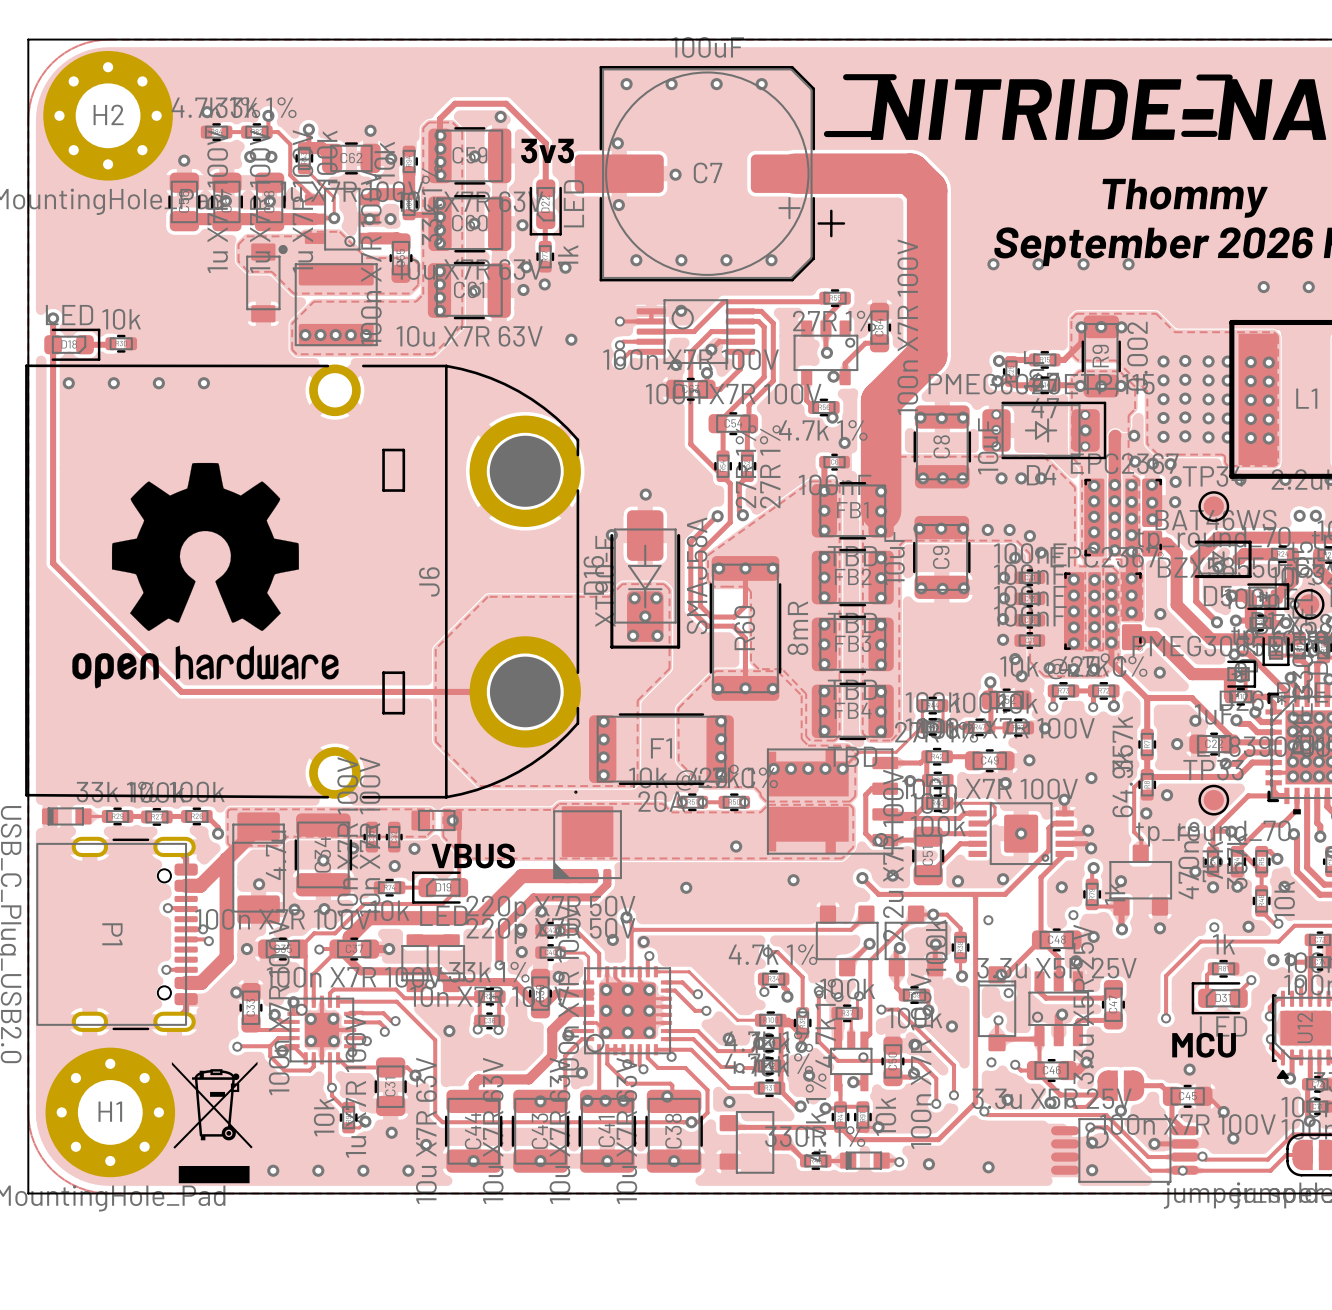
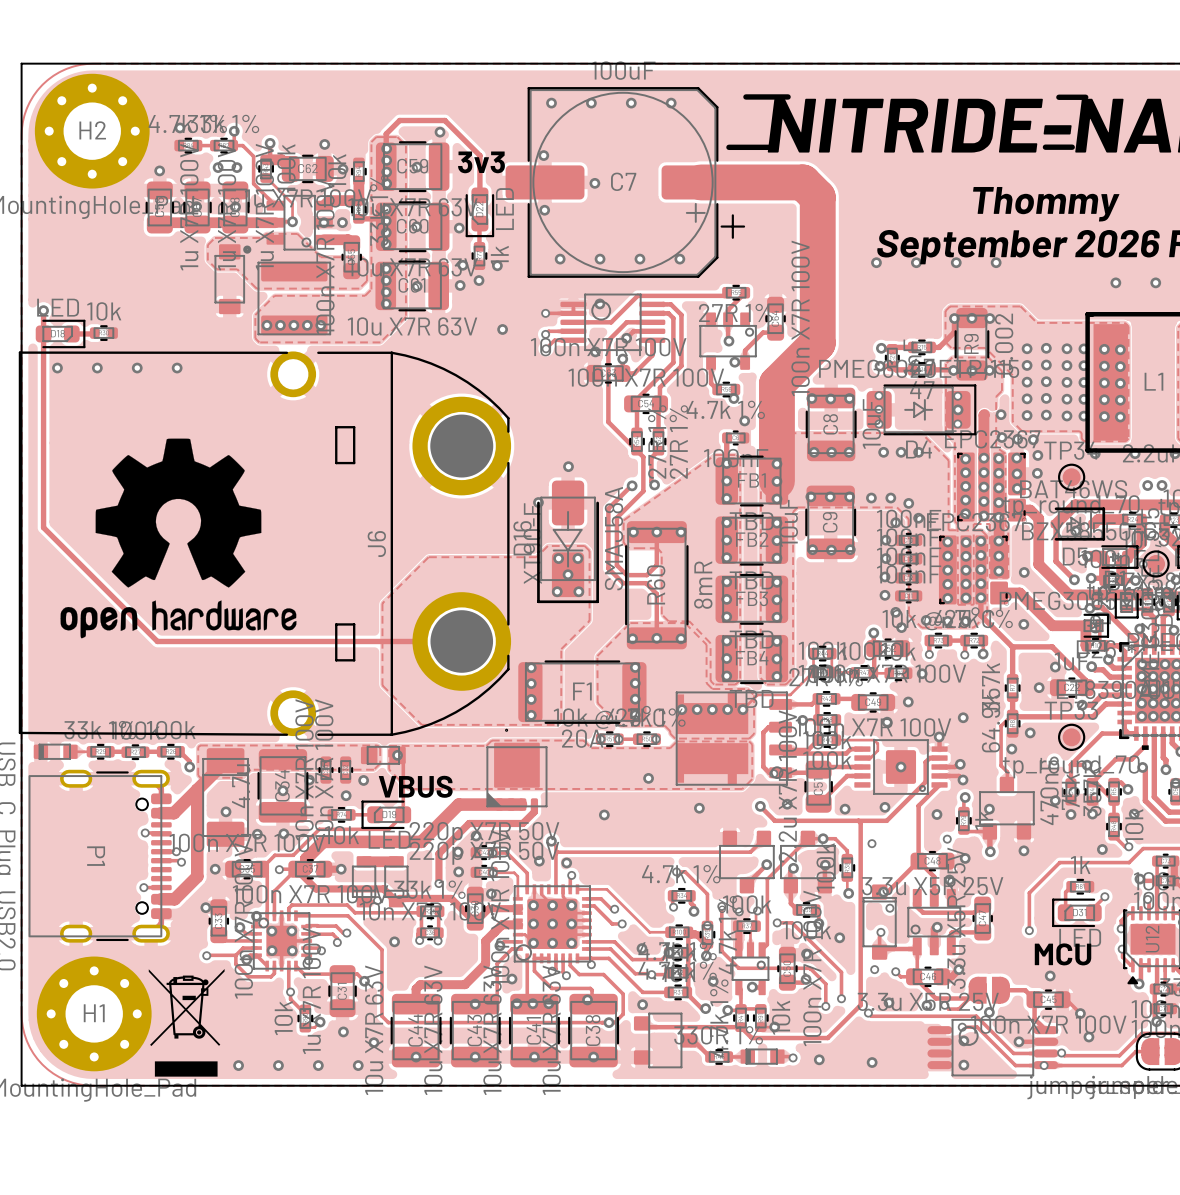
via: (1214, 927) -> none
via: (1273, 960) -> none

